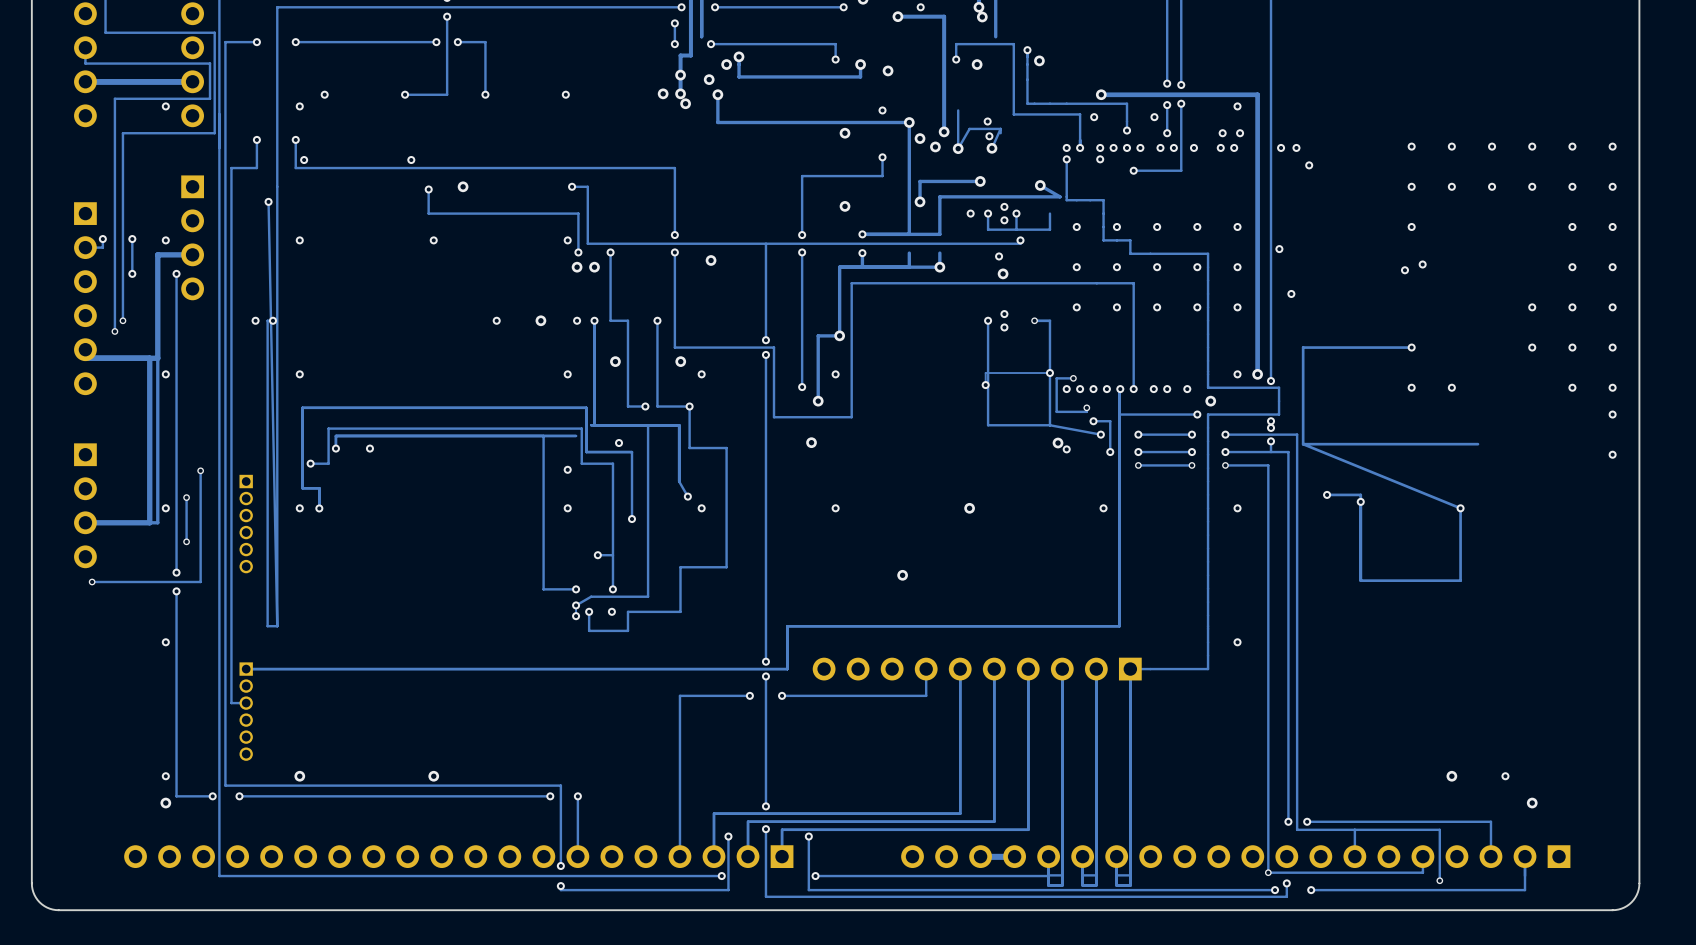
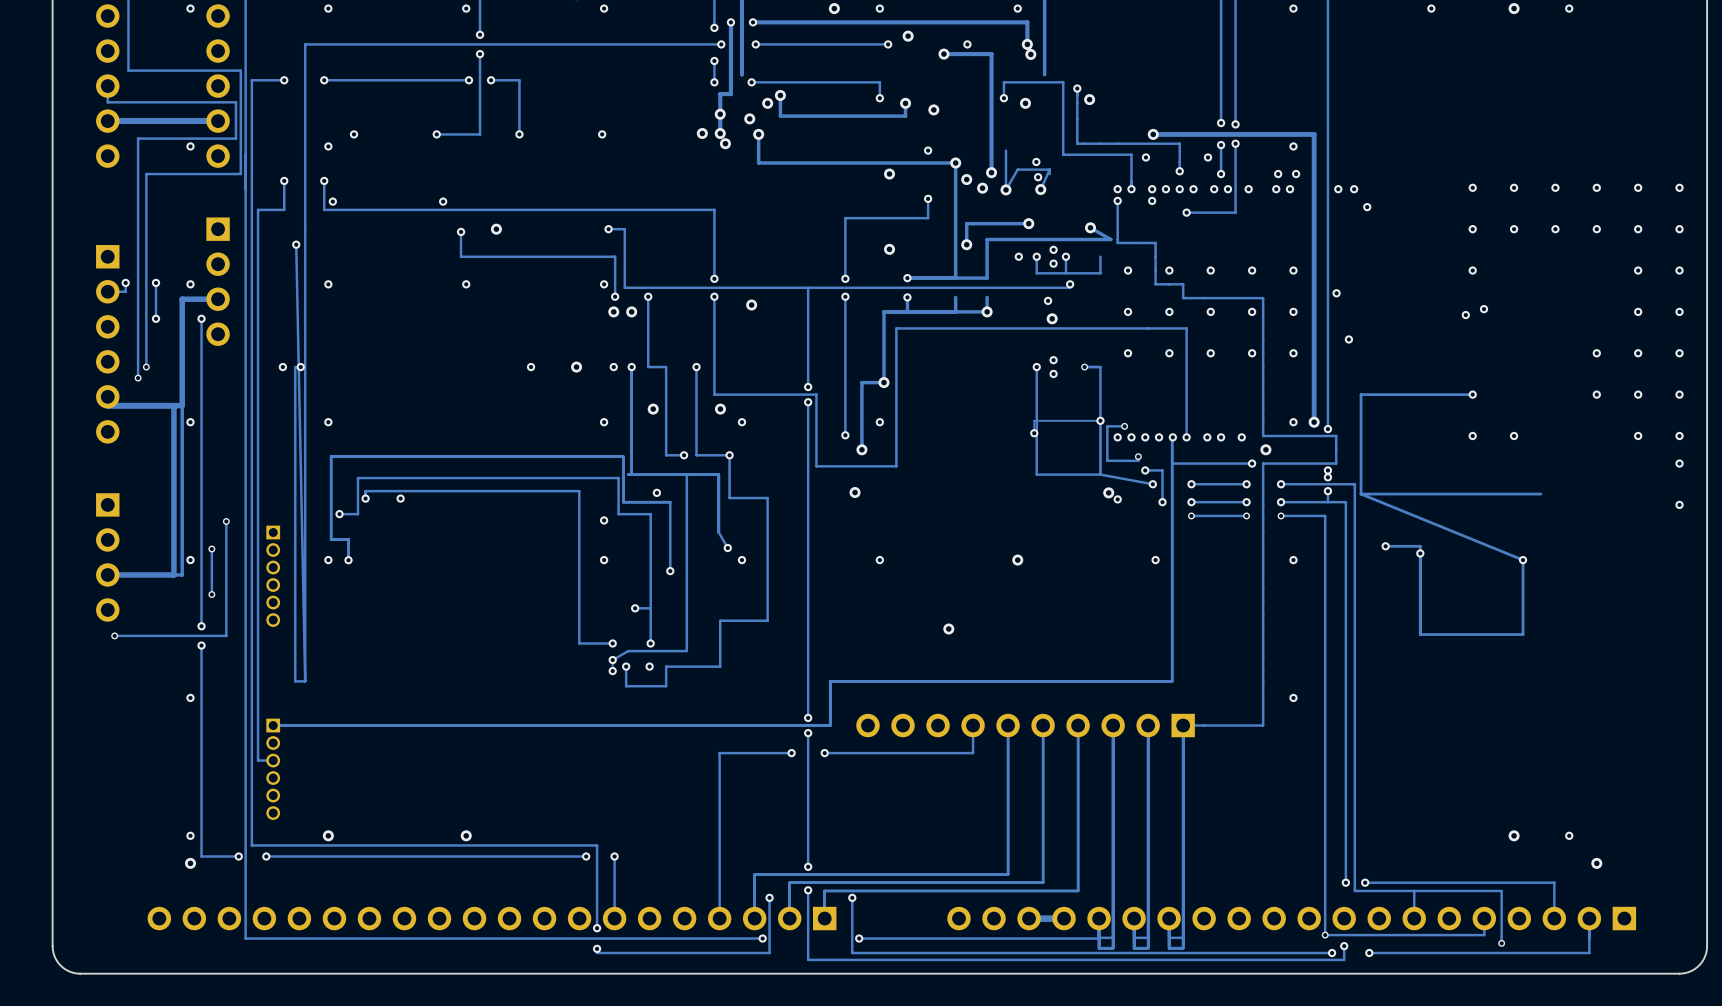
track: (543, 435) (543, 441) -> none
track: (576, 435) (335, 435) (335, 441) -> (579, 491) (365, 491)

